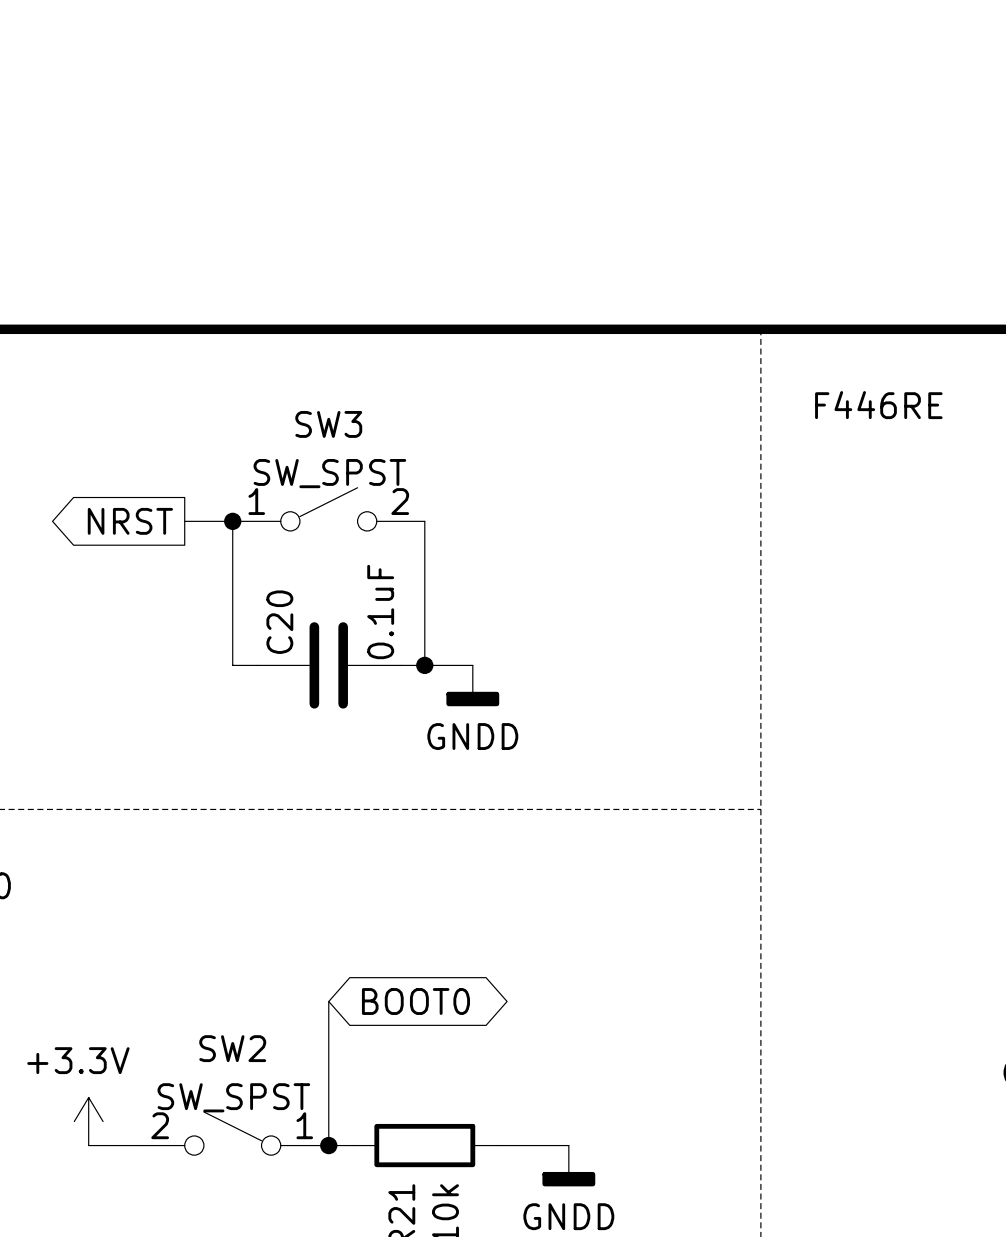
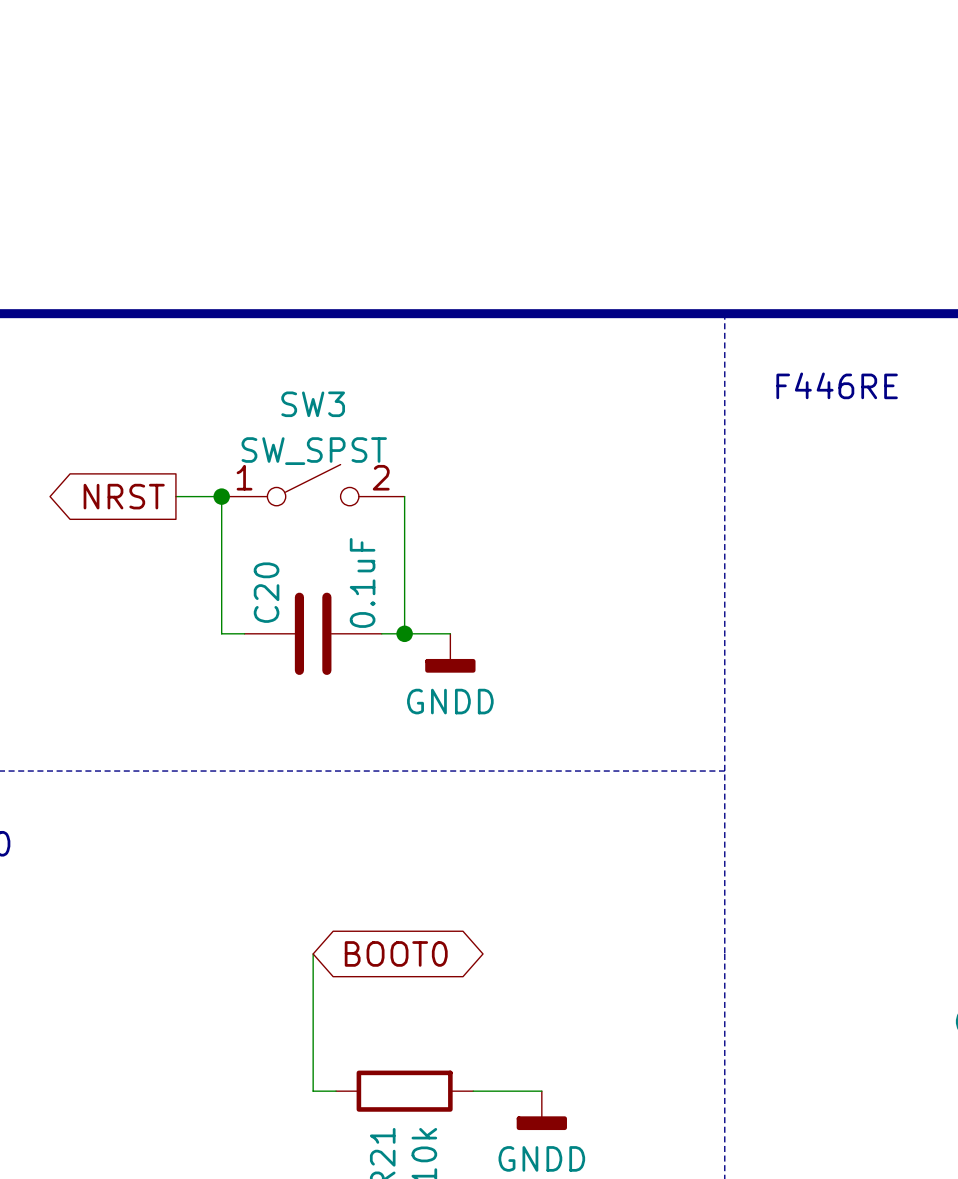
power symbol: +3.3V (88, 1121) -> none
SW2: SW_SPST (232, 1133) -> none
wire: (88, 1145) (136, 1145) -> none
junction: (328, 1145) -> none

